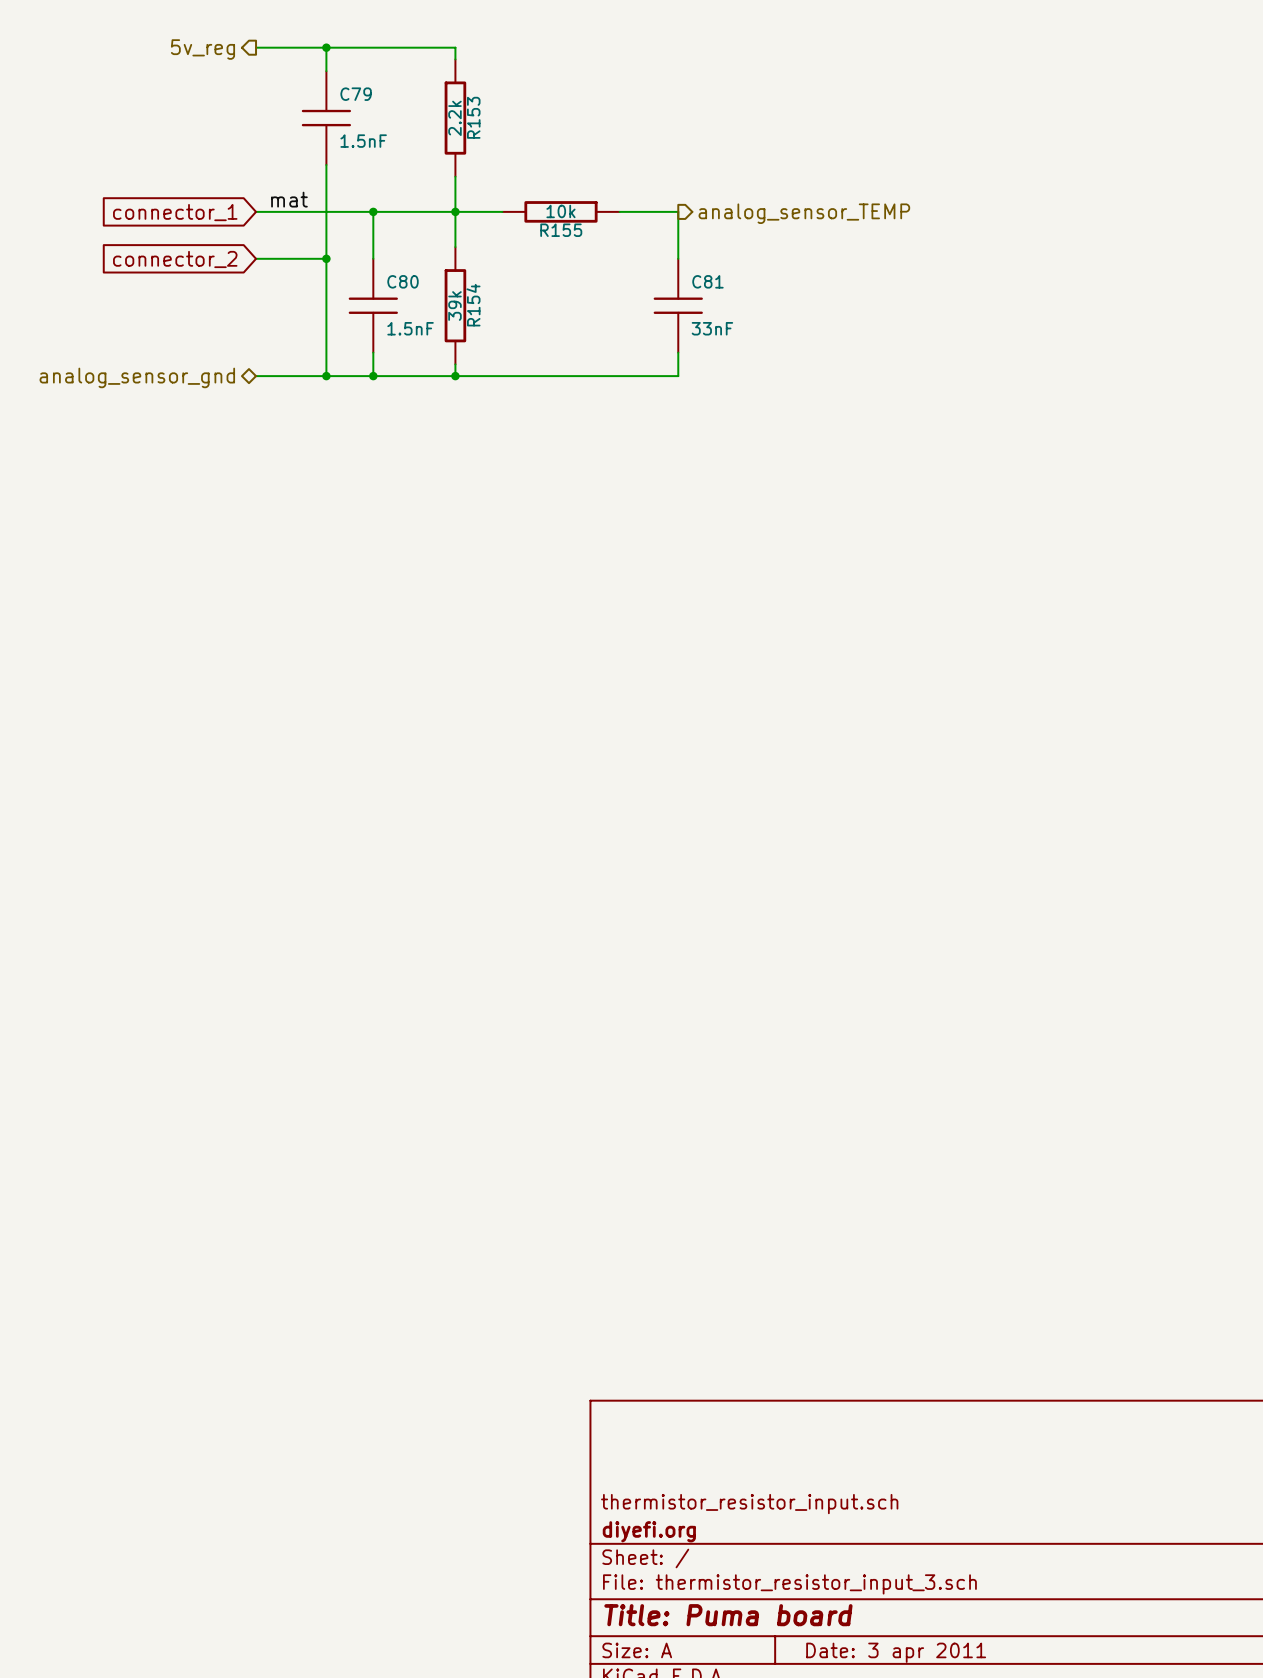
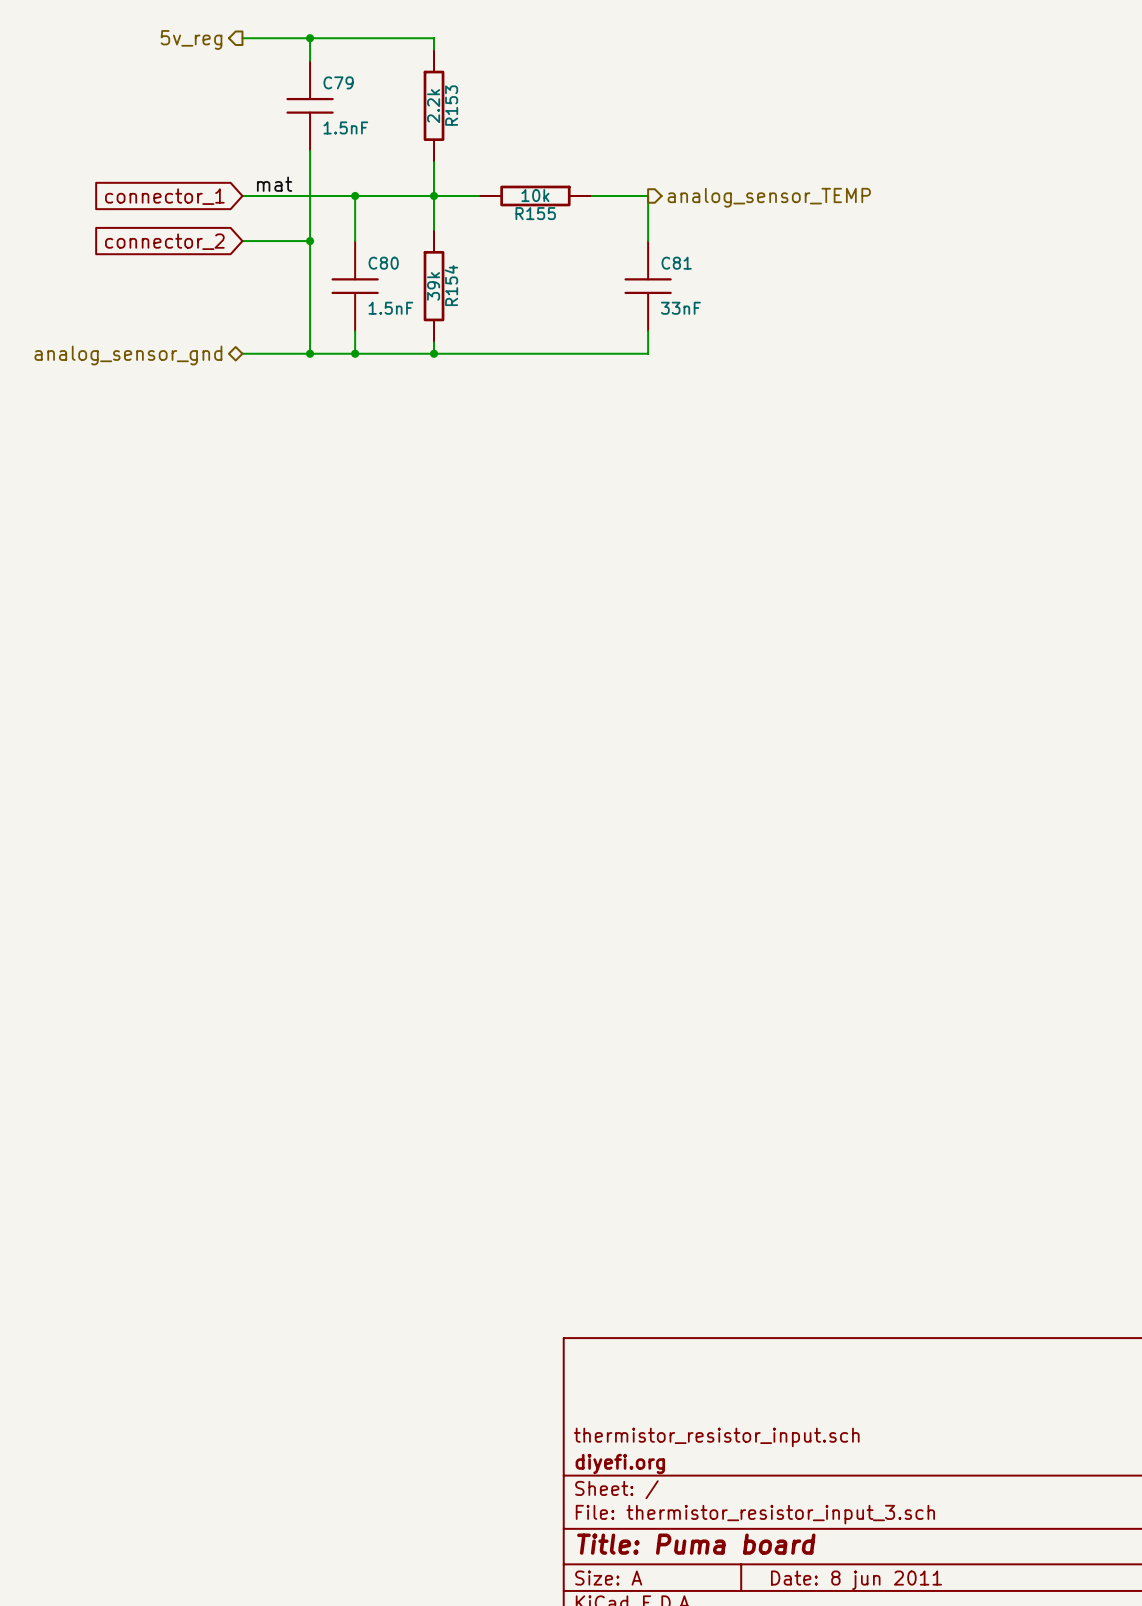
title block: Date: 3 apr 2011 (896, 1652) -> Date: 8 jun 2011 (856, 1580)

